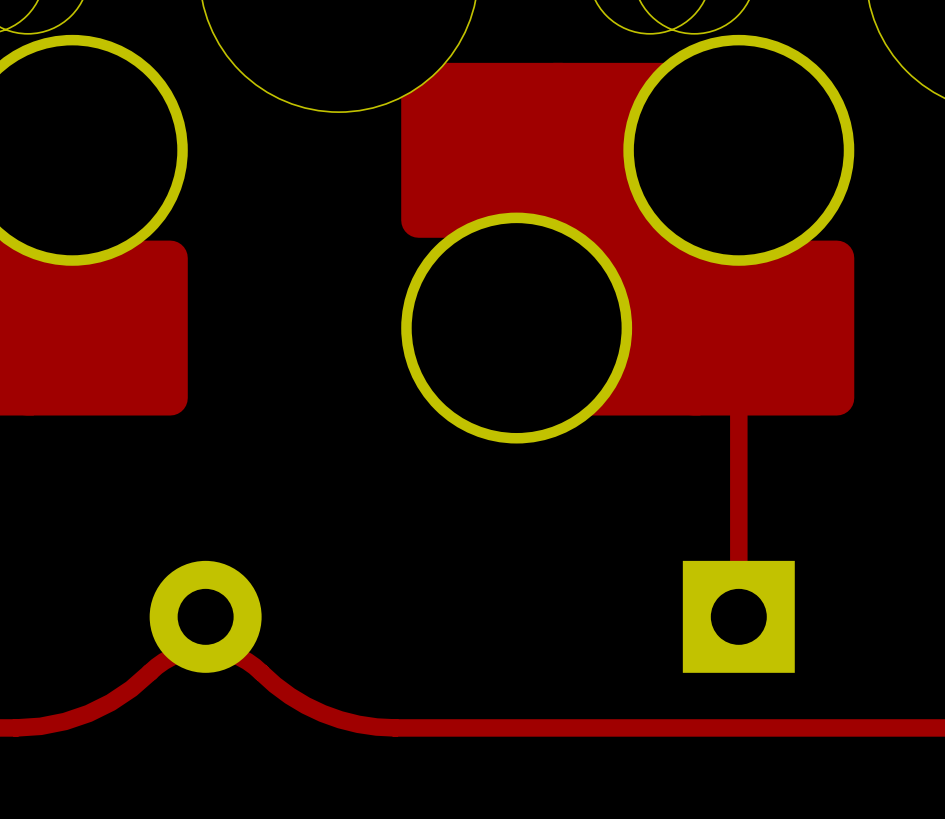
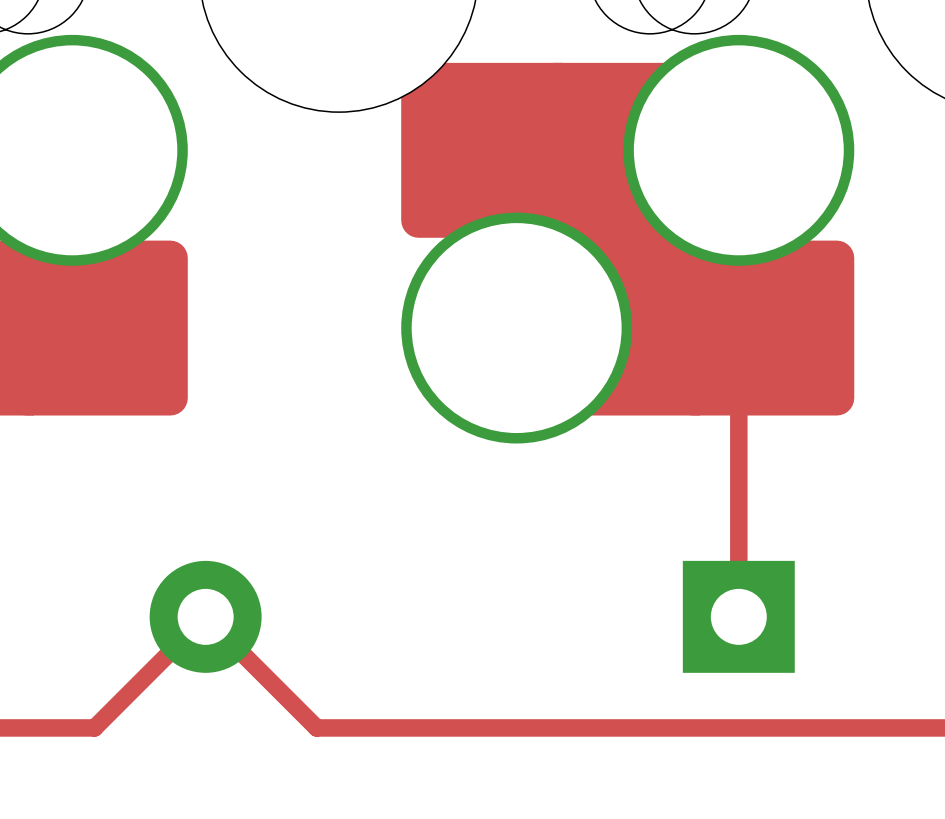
track: (16, 727) (40, 726) (65, 721) (88, 713) (110, 702) (131, 688) (156, 666) (171, 657) (188, 651) (205, 649) (223, 651) (239, 657) (254, 666) (289, 695) (322, 713) (358, 724) (395, 727) -> (16, 727) (94, 727) (205, 616) (316, 727) (395, 727)

